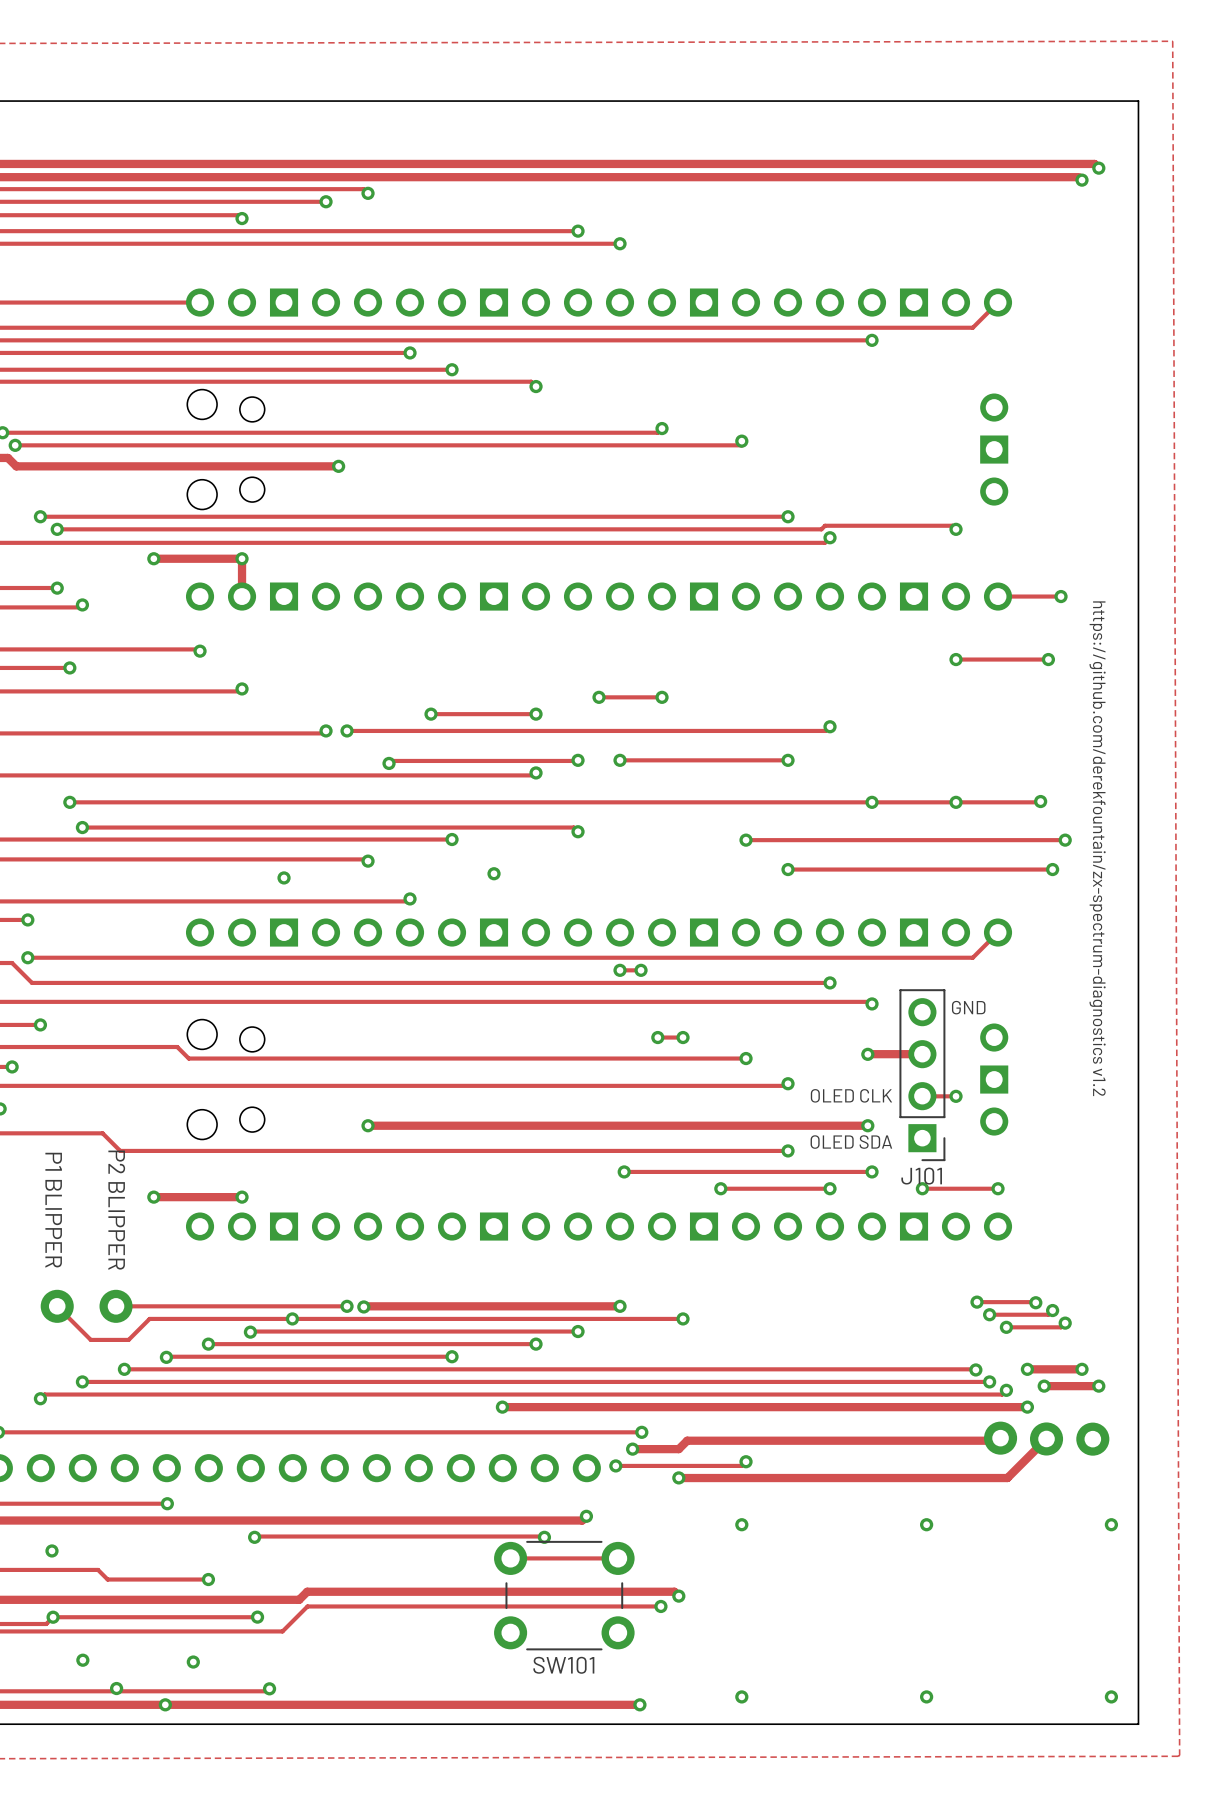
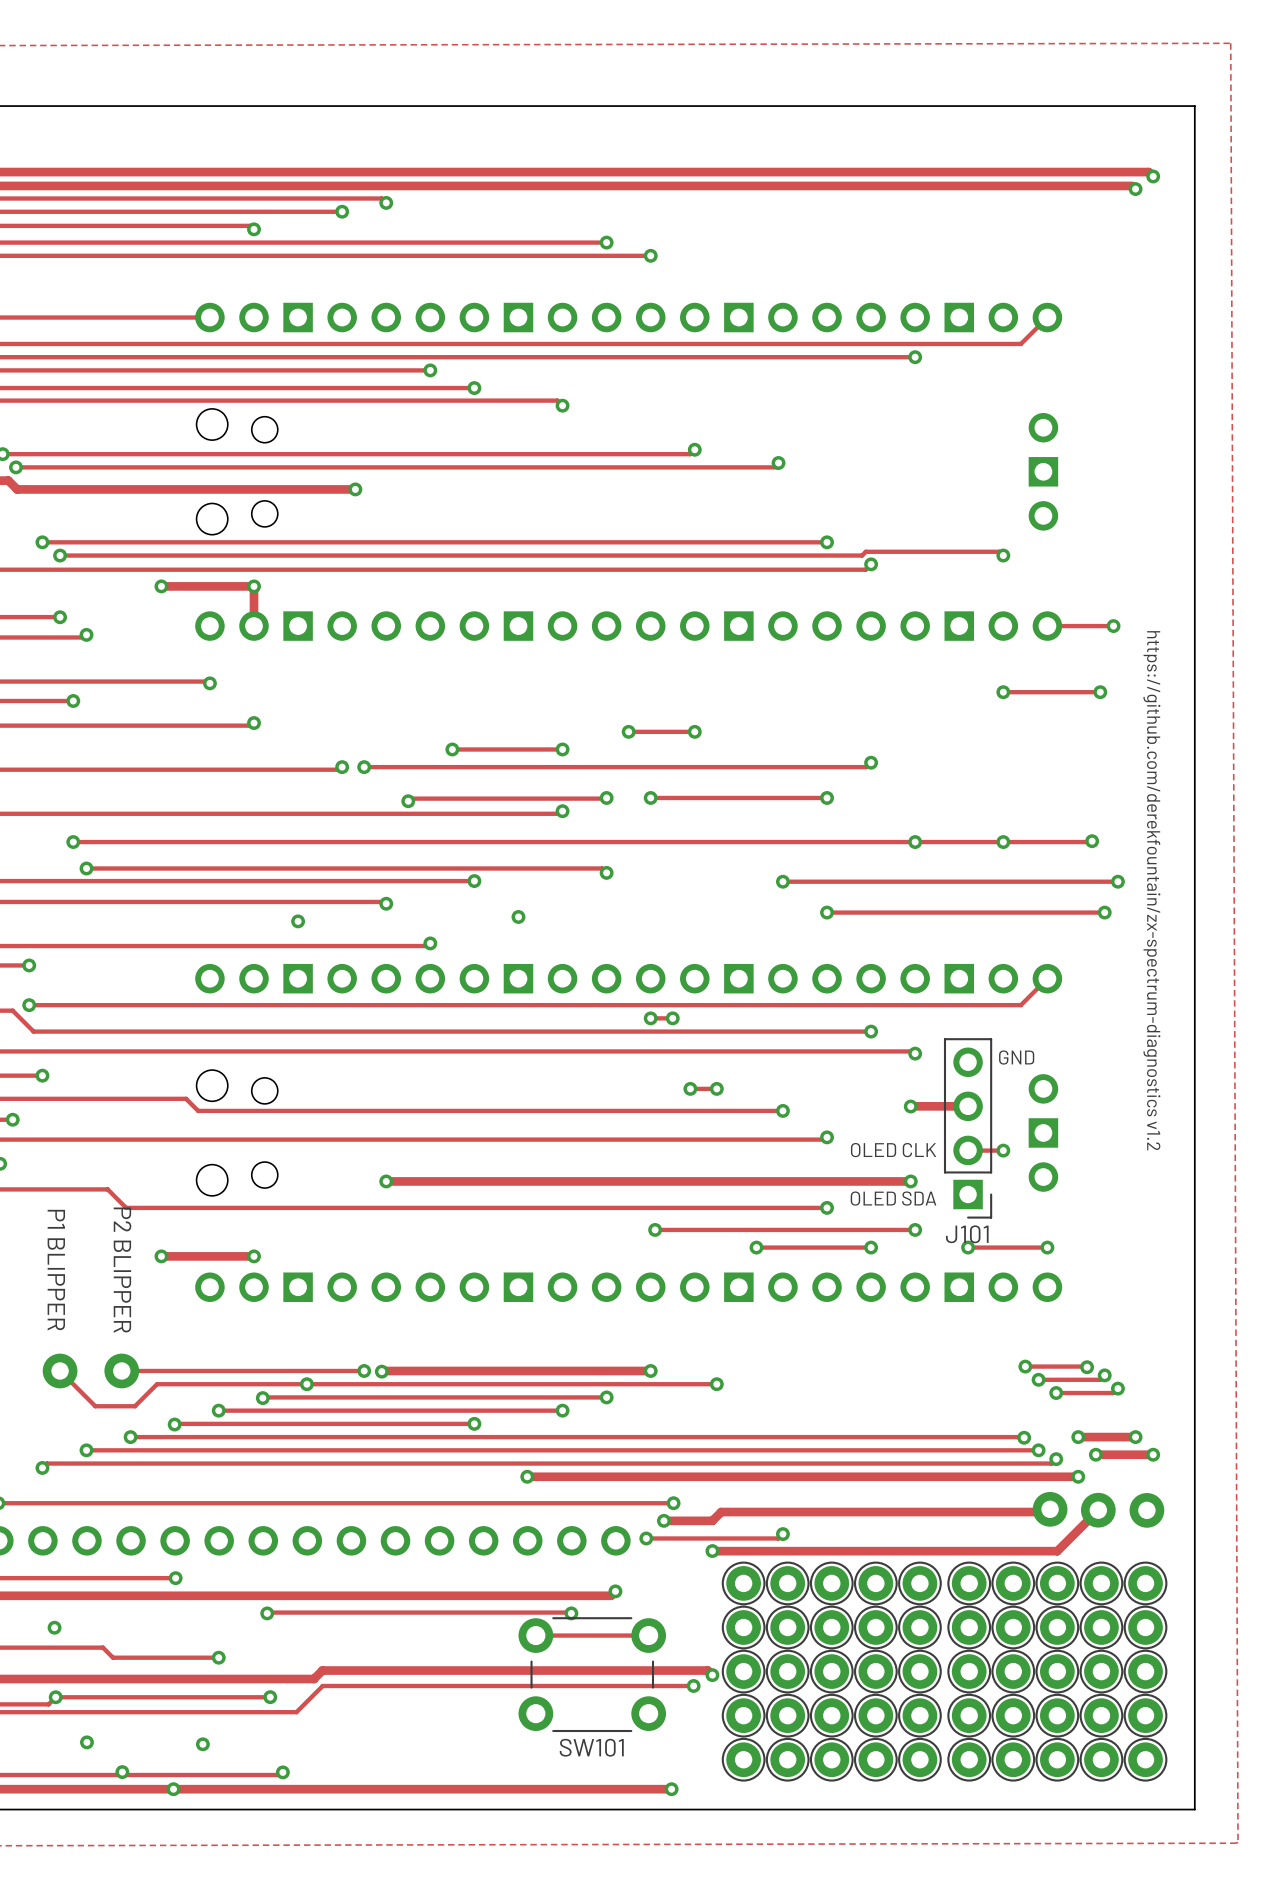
part: none -> (743, 1583)
part: none -> (787, 1583)
part: none -> (831, 1583)
part: none -> (875, 1583)
part: none -> (919, 1583)
part: none -> (969, 1583)
part: none -> (1013, 1583)
part: none -> (1057, 1583)
part: none -> (1101, 1583)
part: none -> (1145, 1583)
via: (741, 1524) -> none
via: (926, 1524) -> none
via: (1111, 1524) -> none
part: none -> (743, 1627)
part: none -> (787, 1627)
part: none -> (831, 1627)
part: none -> (875, 1627)
part: none -> (919, 1627)
part: none -> (969, 1627)
part: none -> (1013, 1627)
part: none -> (1057, 1627)
part: none -> (1101, 1627)
part: none -> (1145, 1627)
part: none -> (743, 1671)
part: none -> (787, 1671)
part: none -> (831, 1671)
part: none -> (875, 1671)
part: none -> (919, 1671)
part: none -> (969, 1671)
part: none -> (1013, 1671)
part: none -> (1057, 1671)
part: none -> (1101, 1671)
part: none -> (1145, 1671)
part: none -> (743, 1715)
part: none -> (787, 1715)
part: none -> (831, 1715)
part: none -> (875, 1715)
part: none -> (919, 1715)
part: none -> (969, 1715)
part: none -> (1013, 1715)
part: none -> (1057, 1715)
part: none -> (1101, 1715)
part: none -> (1145, 1715)
part: none -> (743, 1759)
part: none -> (787, 1759)
part: none -> (831, 1759)
part: none -> (875, 1759)
part: none -> (919, 1759)
part: none -> (969, 1759)
part: none -> (1013, 1759)
part: none -> (1057, 1759)
part: none -> (1101, 1759)
part: none -> (1145, 1759)
via: (741, 1696) -> none
via: (926, 1696) -> none
via: (1111, 1696) -> none

